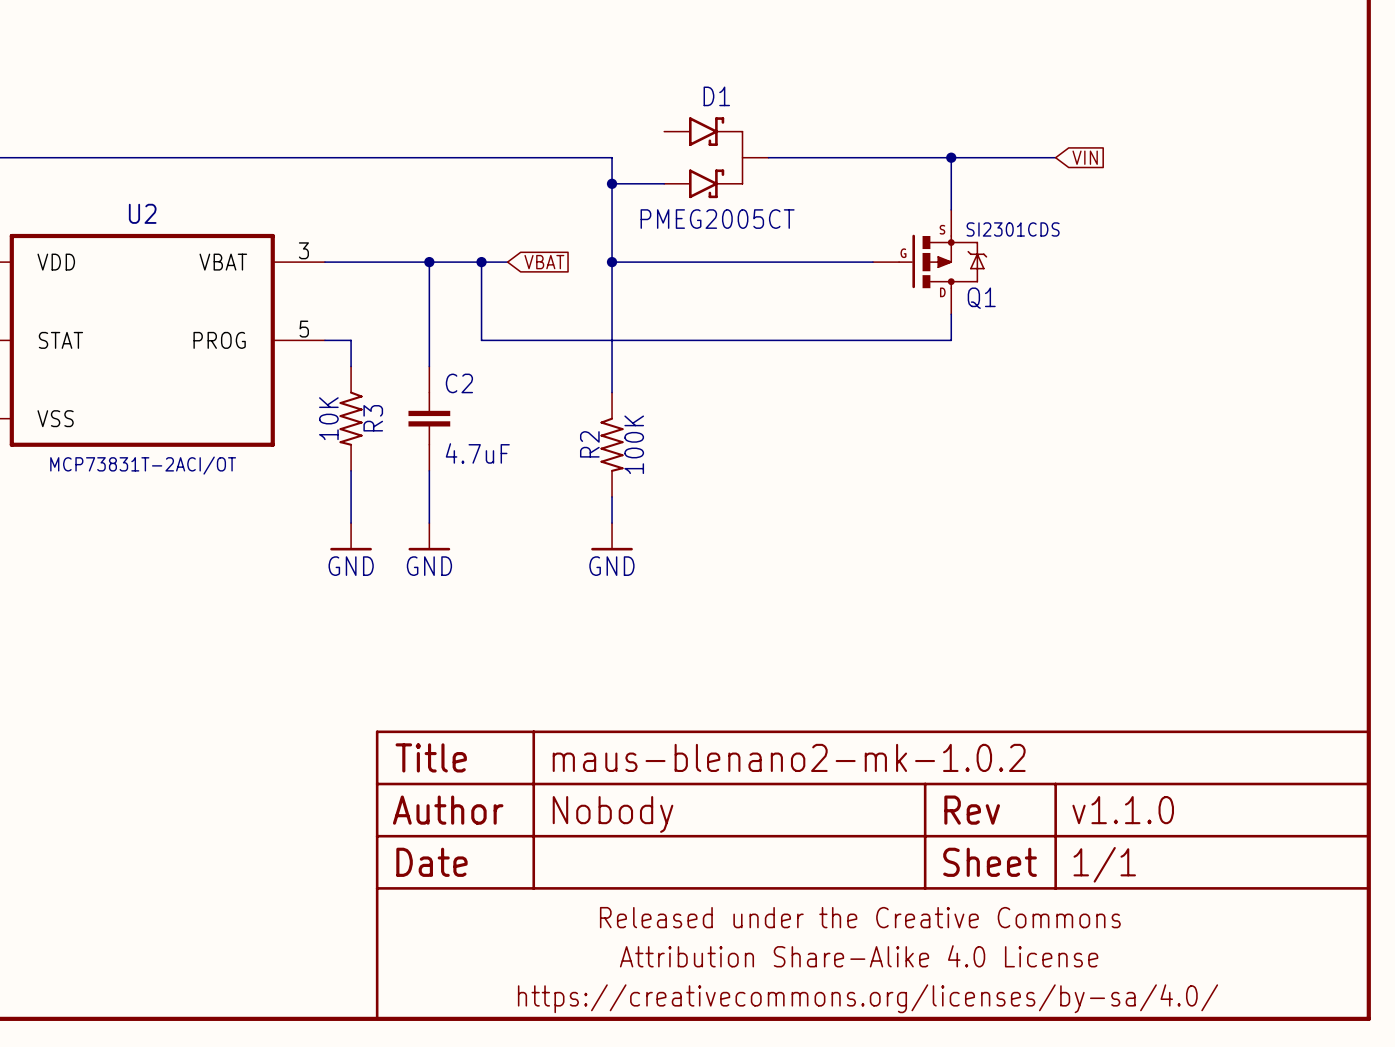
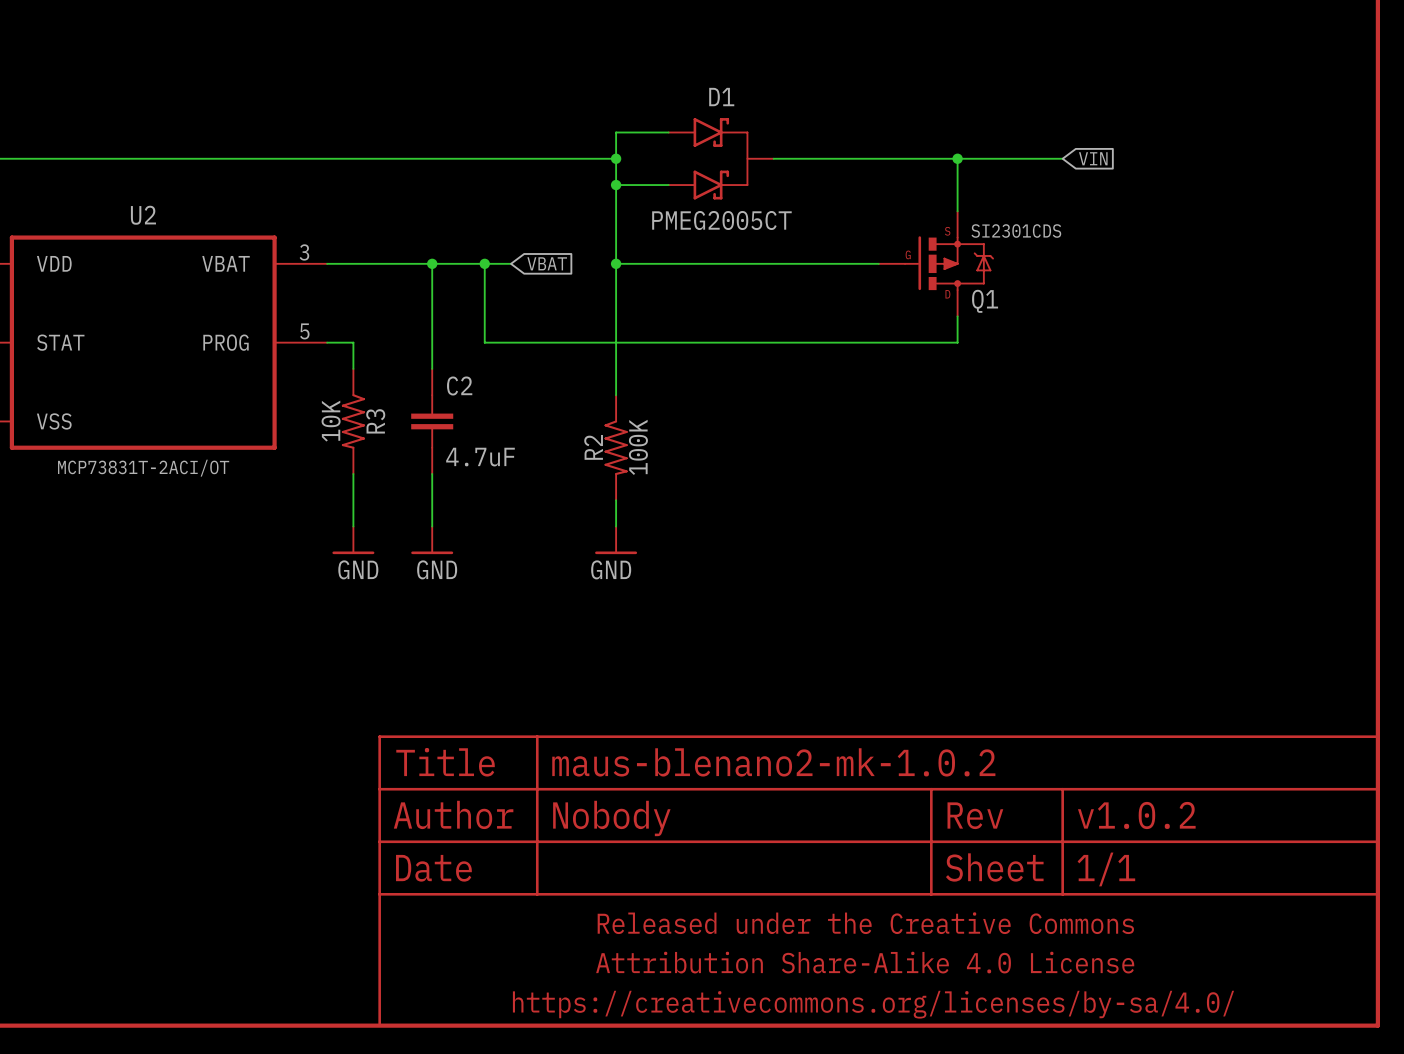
wire: none -> (668, 132) (616, 132) (616, 158)
junction: none -> (616, 158)
part text: v1.1.0 (1123, 810) -> v1.0.2 (1136, 815)

